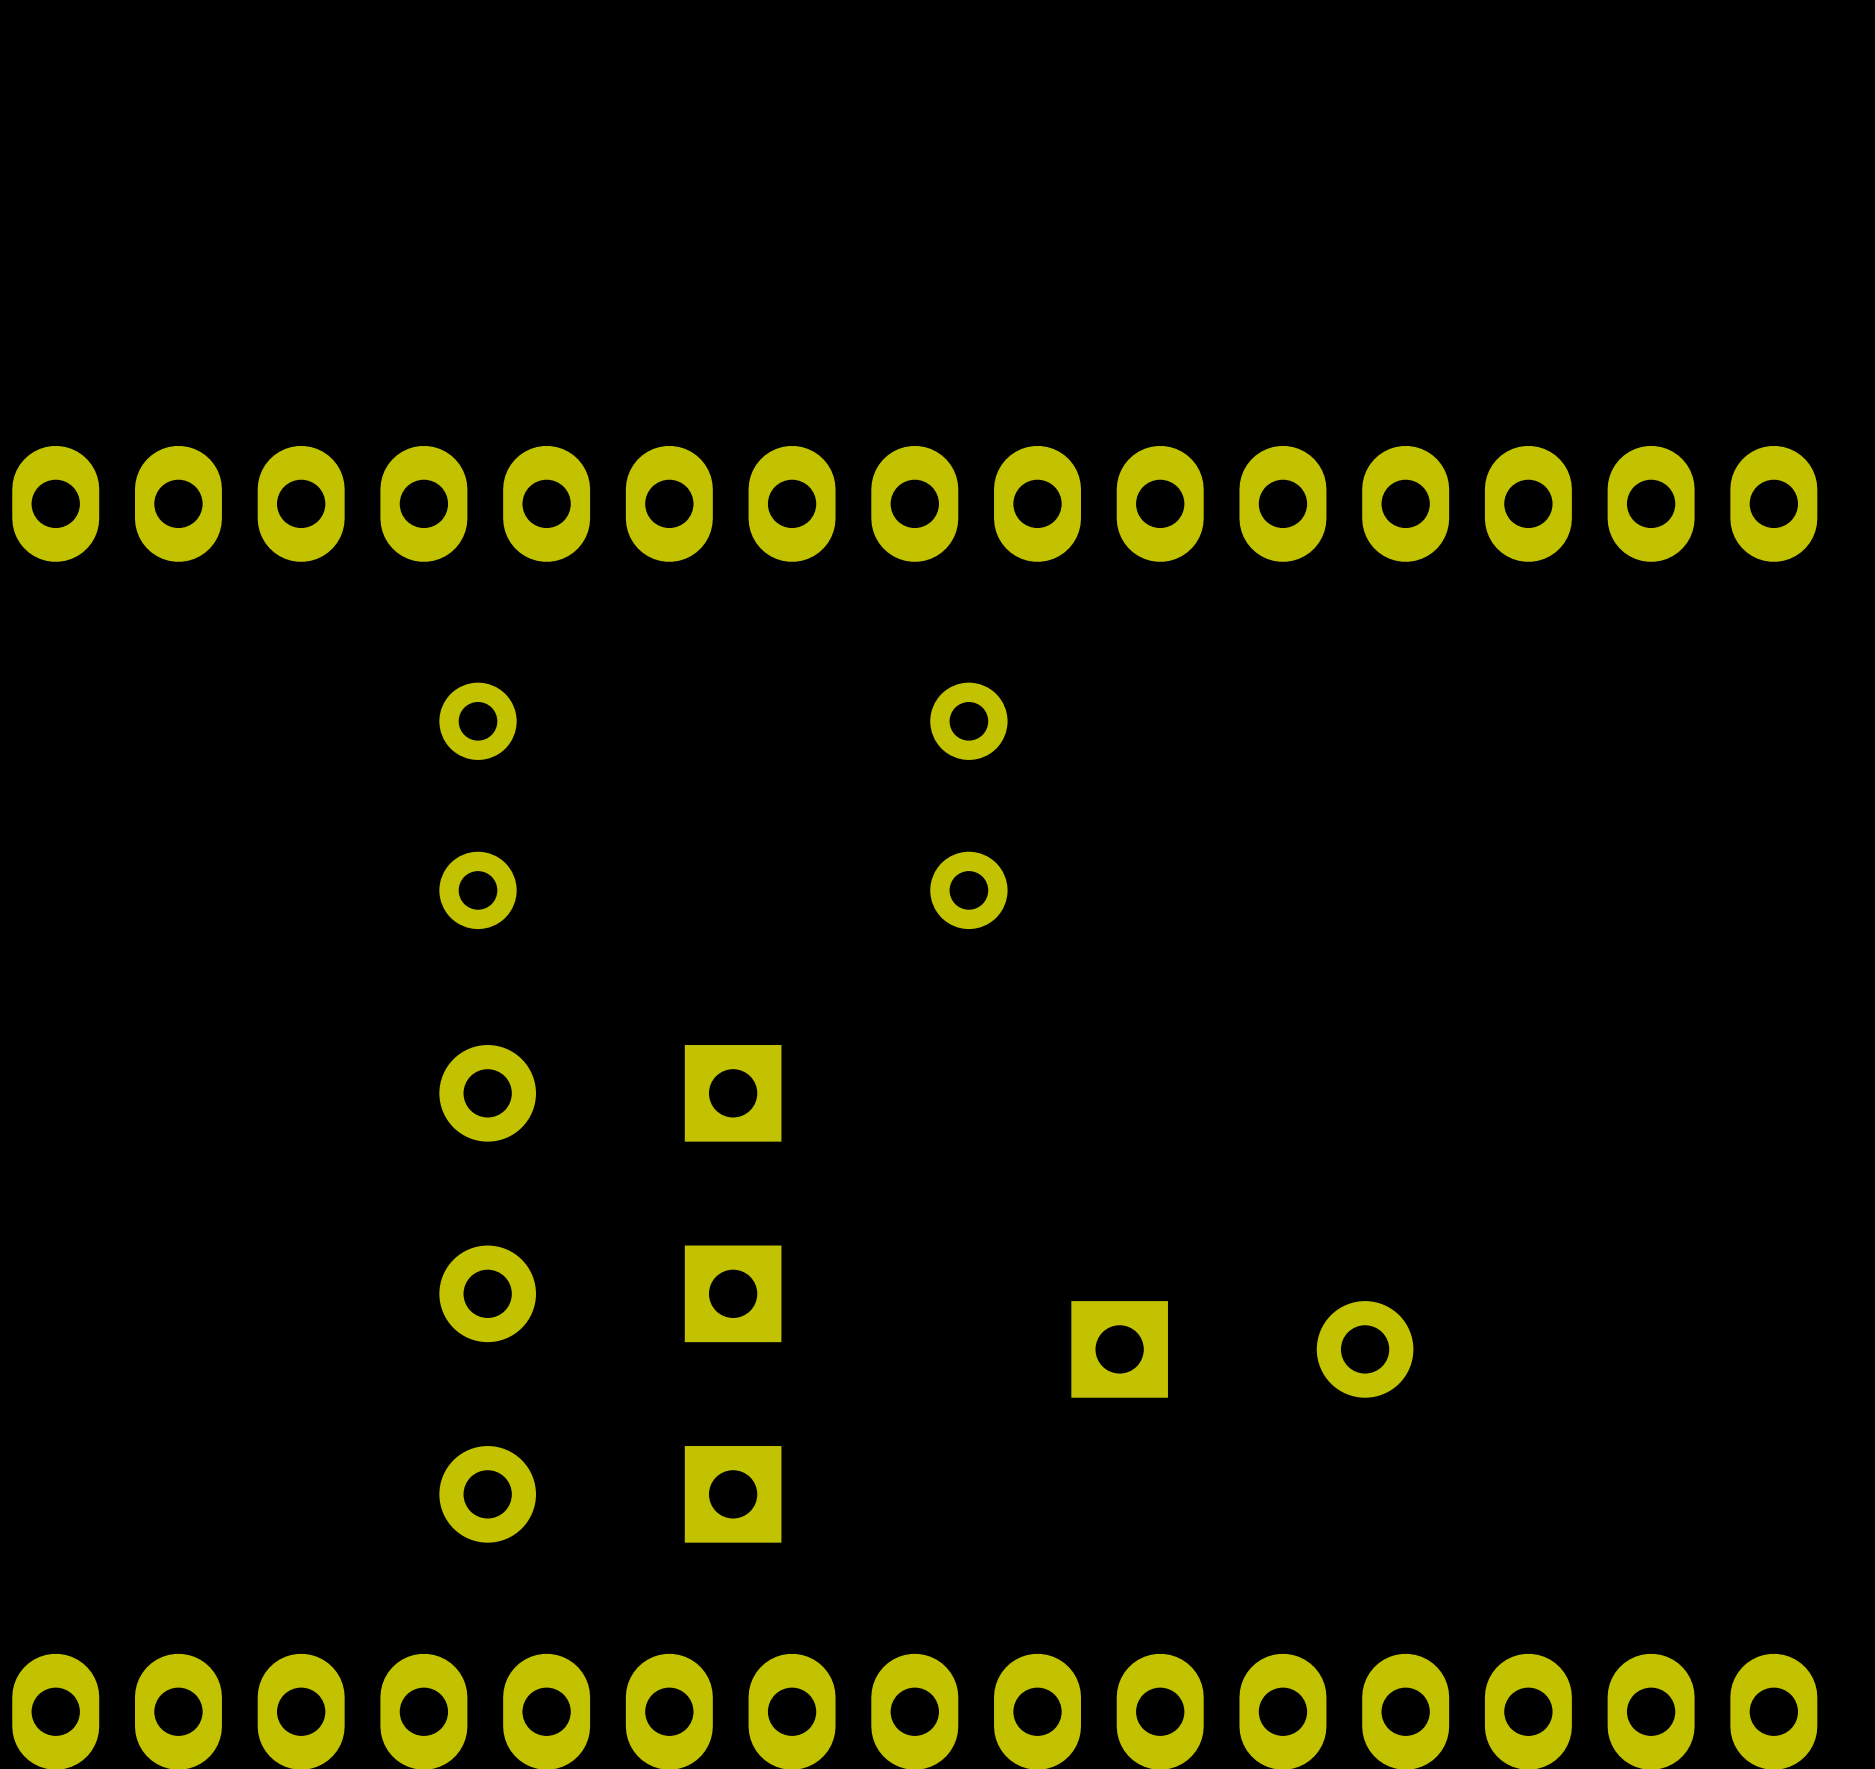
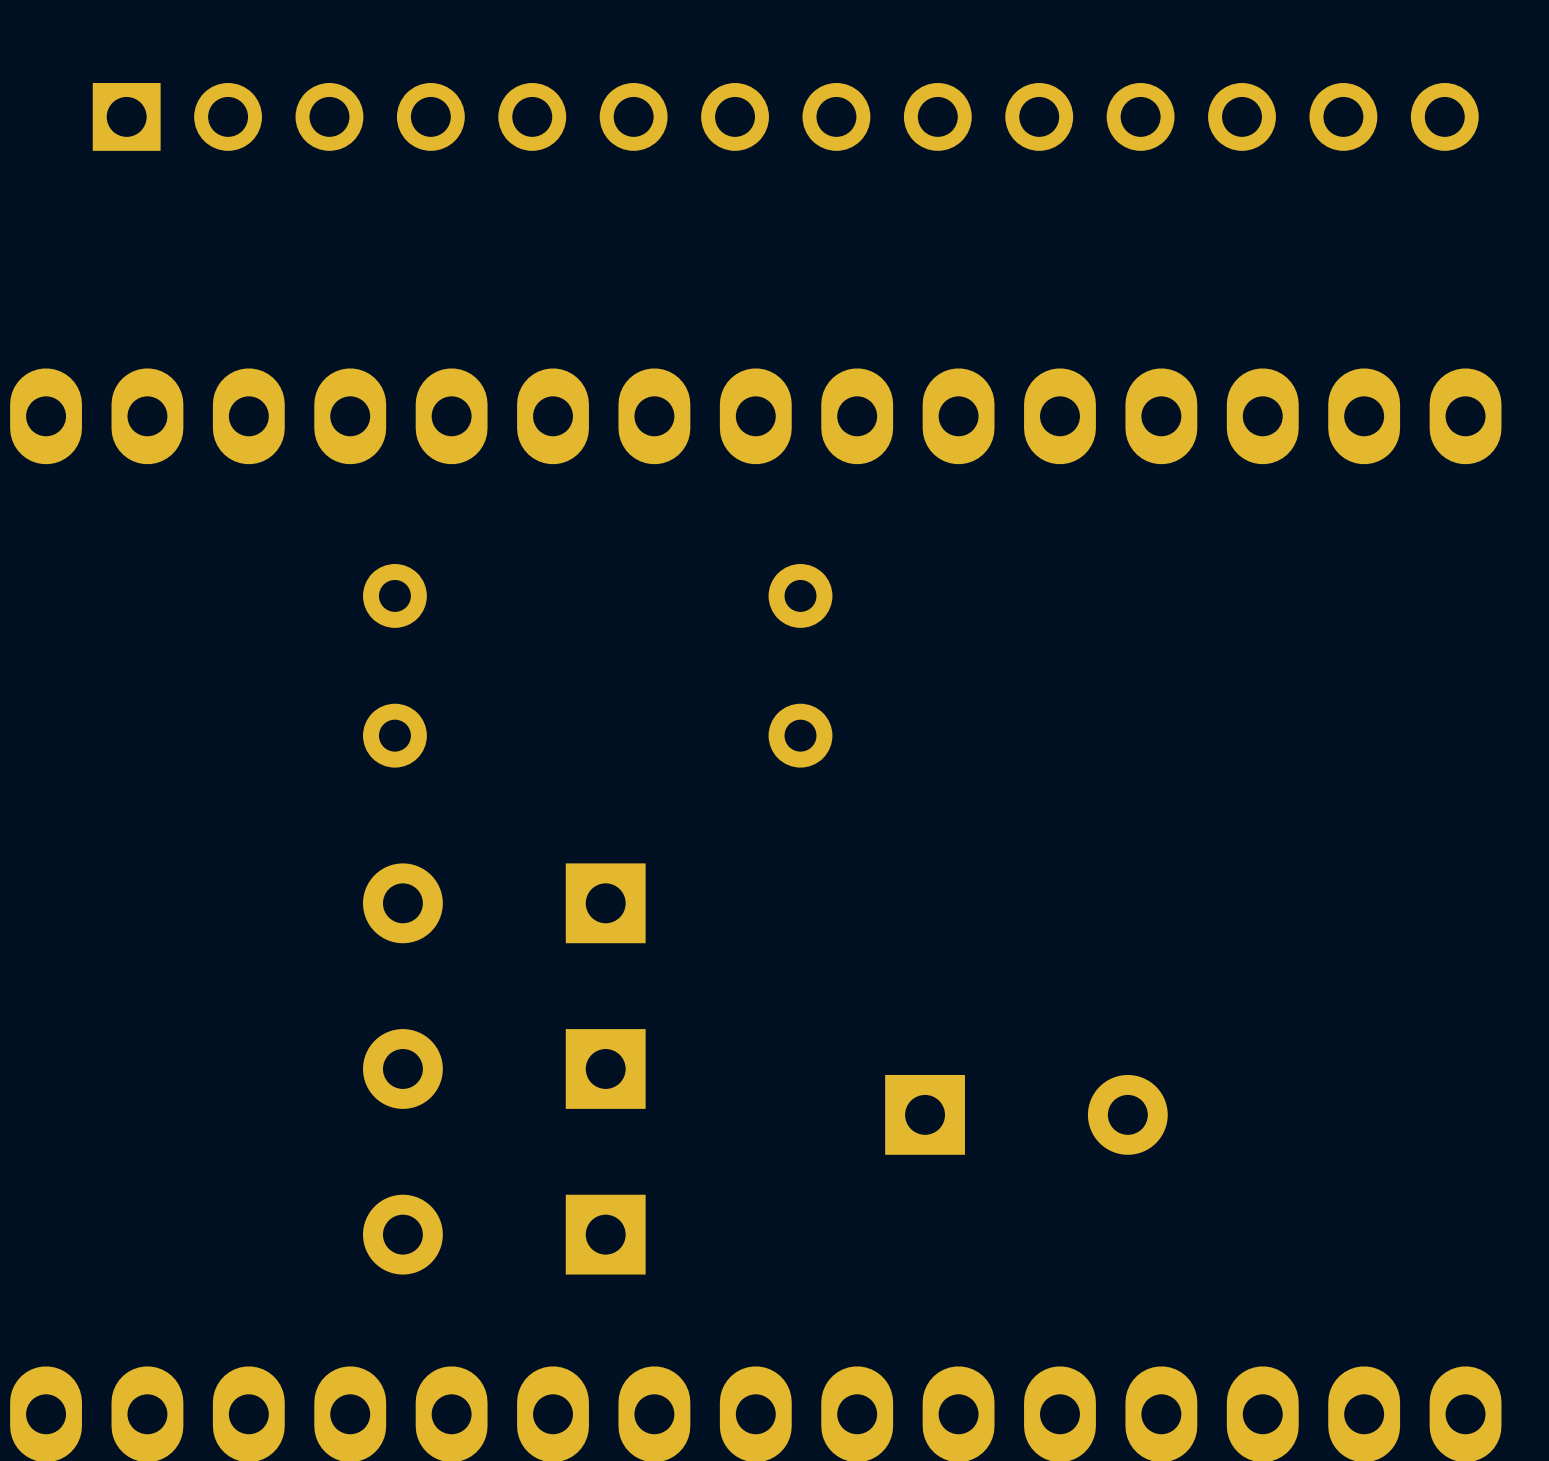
part: none -> (785, 116)

